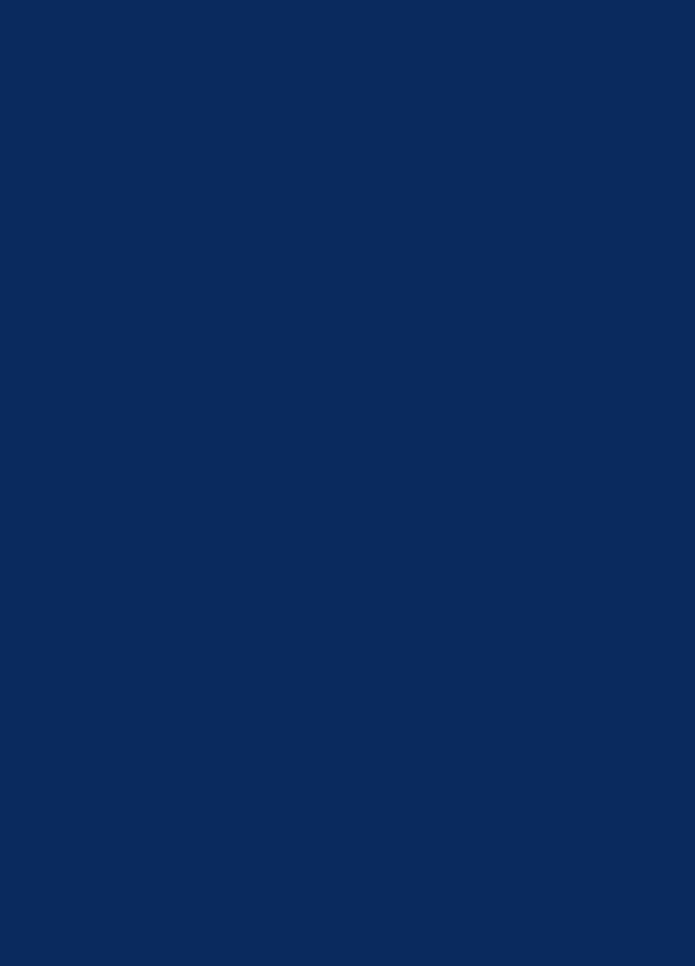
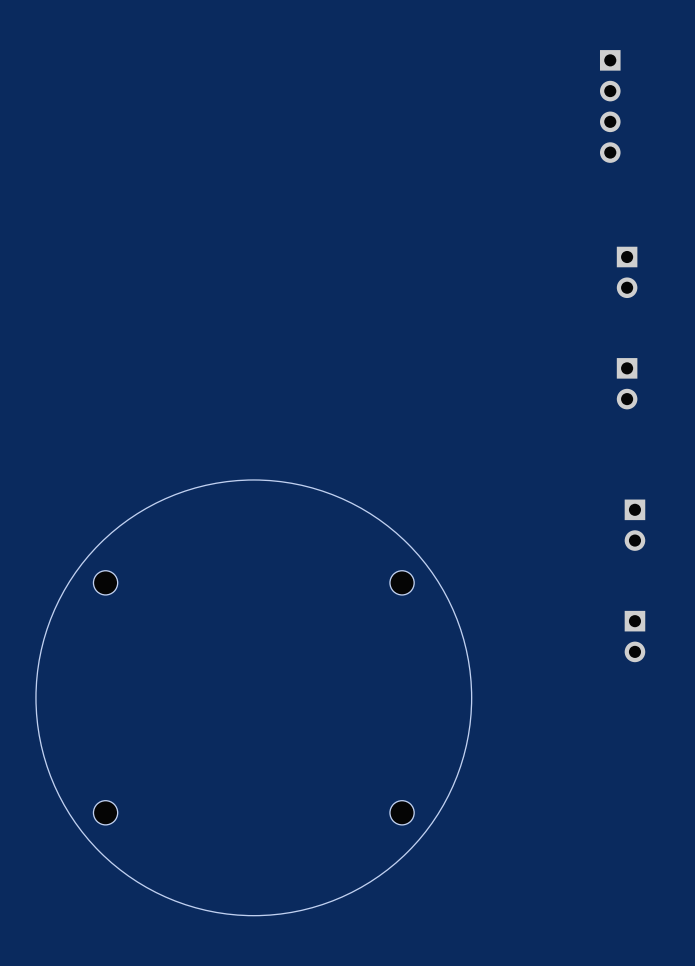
part: none -> (610, 106)
part: none -> (627, 272)
part: none -> (627, 383)
round board edge: none -> [35, 479, 472, 916]
part: none -> (634, 525)
part: none -> (105, 582)
part: none -> (402, 582)
part: none -> (634, 636)
part: none -> (105, 812)
part: none -> (402, 812)

